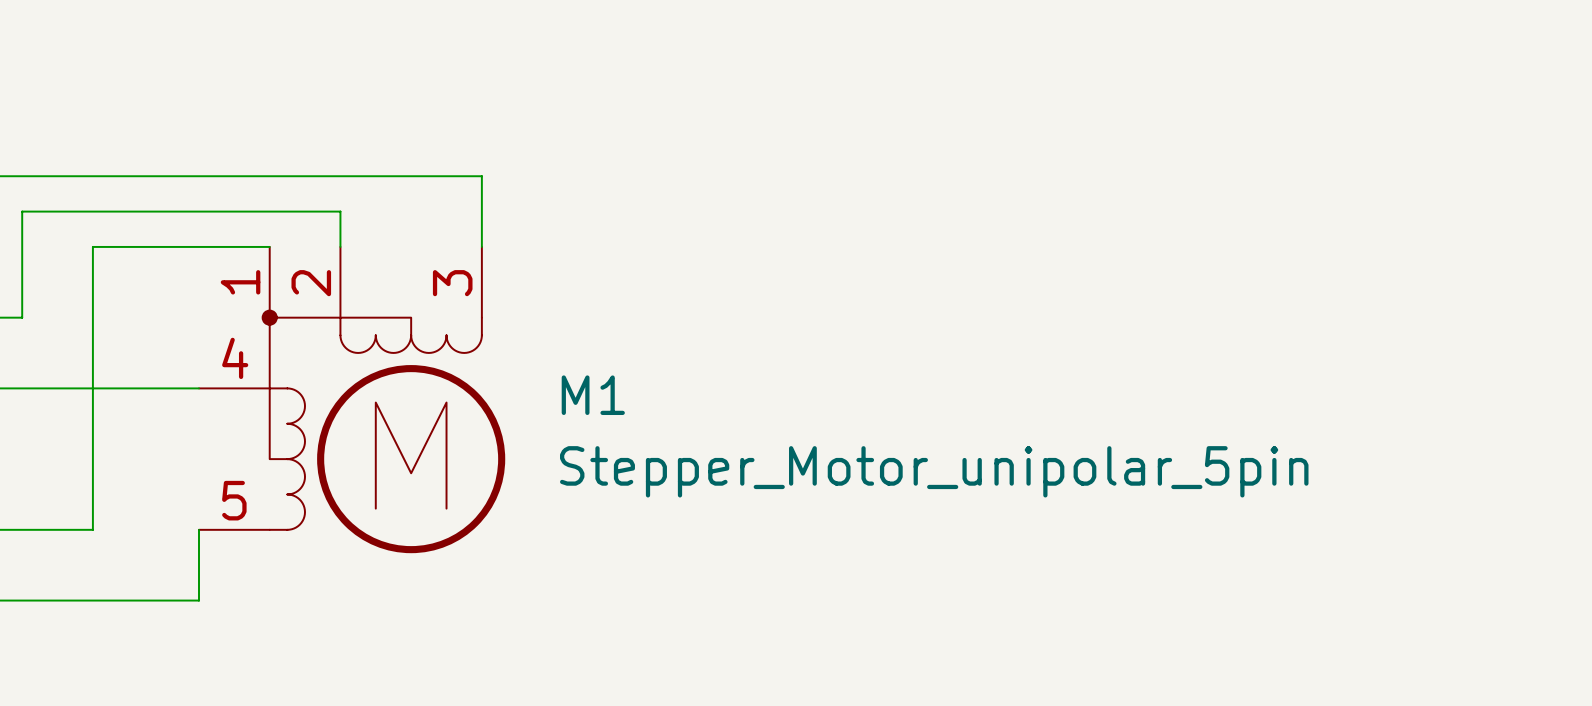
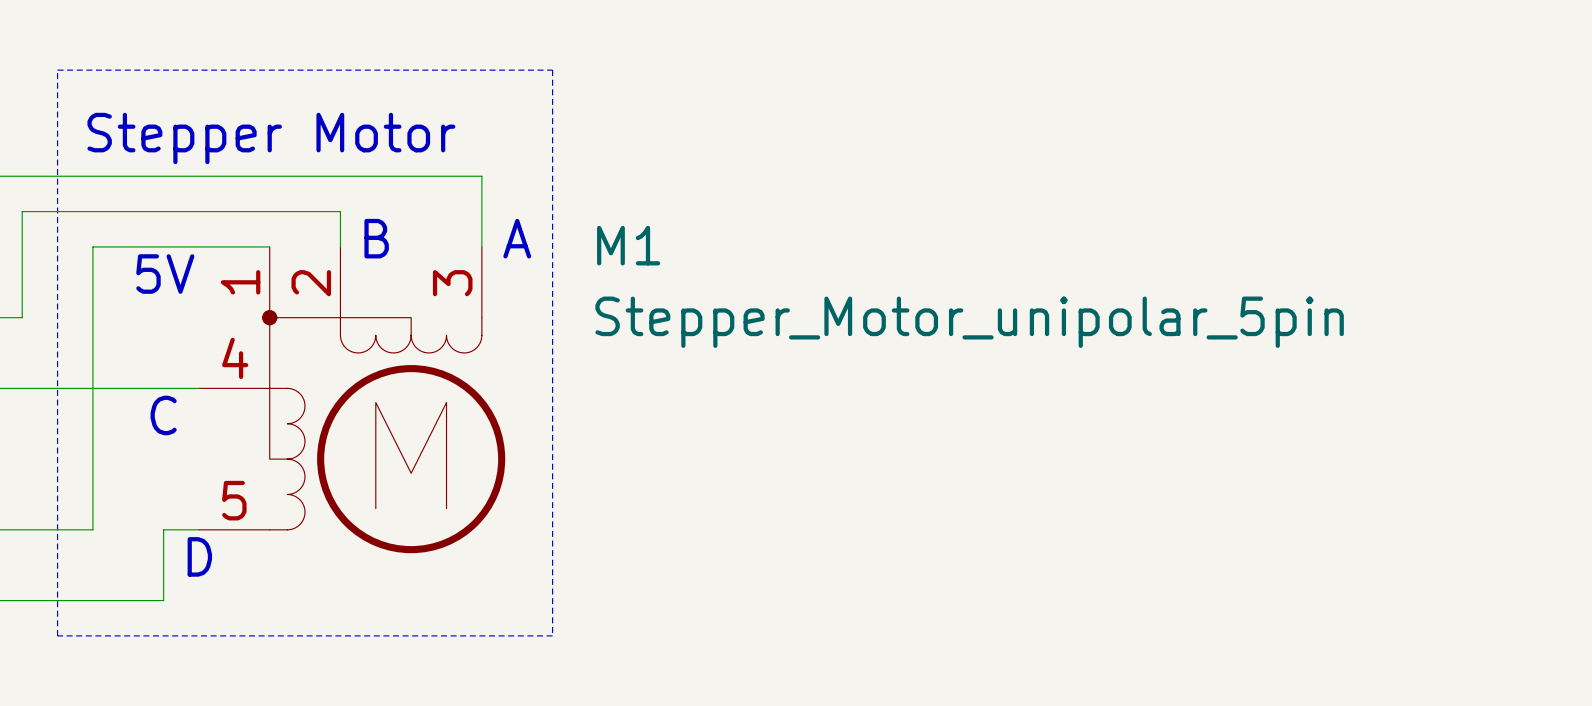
line: none -> (57, 70) (552, 70) (552, 635) (57, 635) (57, 70)
text: none -> Stepper Motor (271, 138)
text: none -> B (376, 238)
text: none -> A (517, 238)
text: none -> 5V (165, 274)
M1 name position: M1 (593, 395) -> M1 (628, 245)
text: none -> C (163, 415)
M1 value position: Stepper_Motor_unipolar_5pin (934, 471) -> Stepper_Motor_unipolar_5pin (969, 322)
wire: (199, 529) (199, 600) (163, 600) -> (199, 529) (163, 529) (163, 600)
text: none -> D (199, 556)

